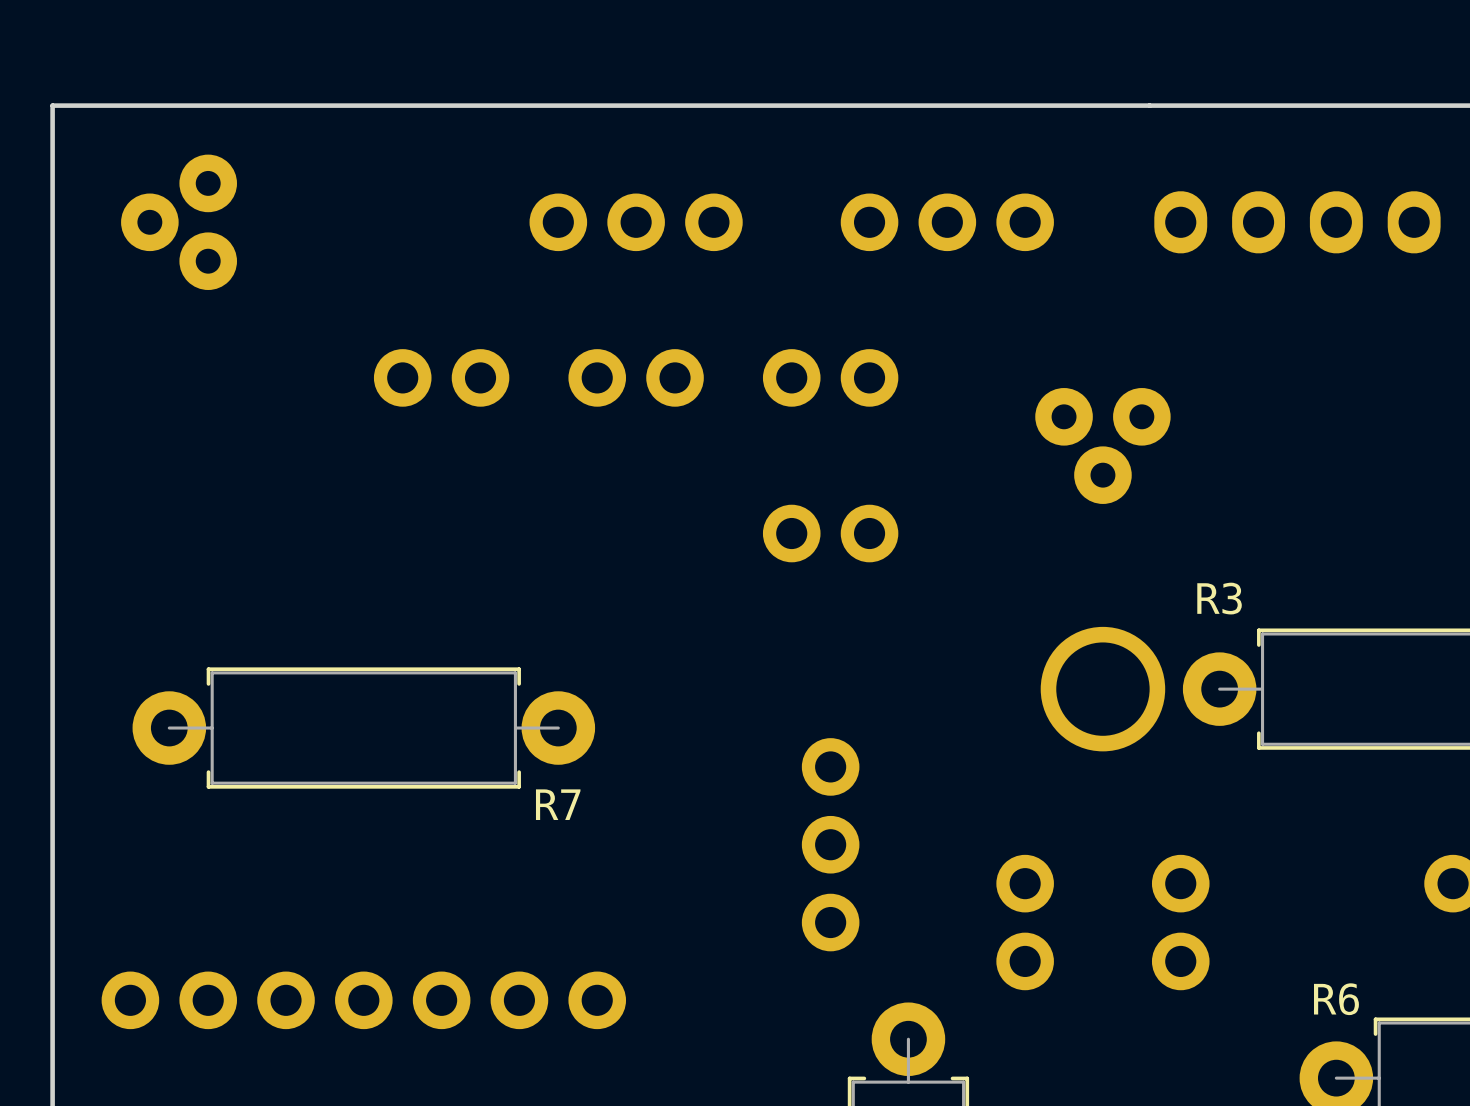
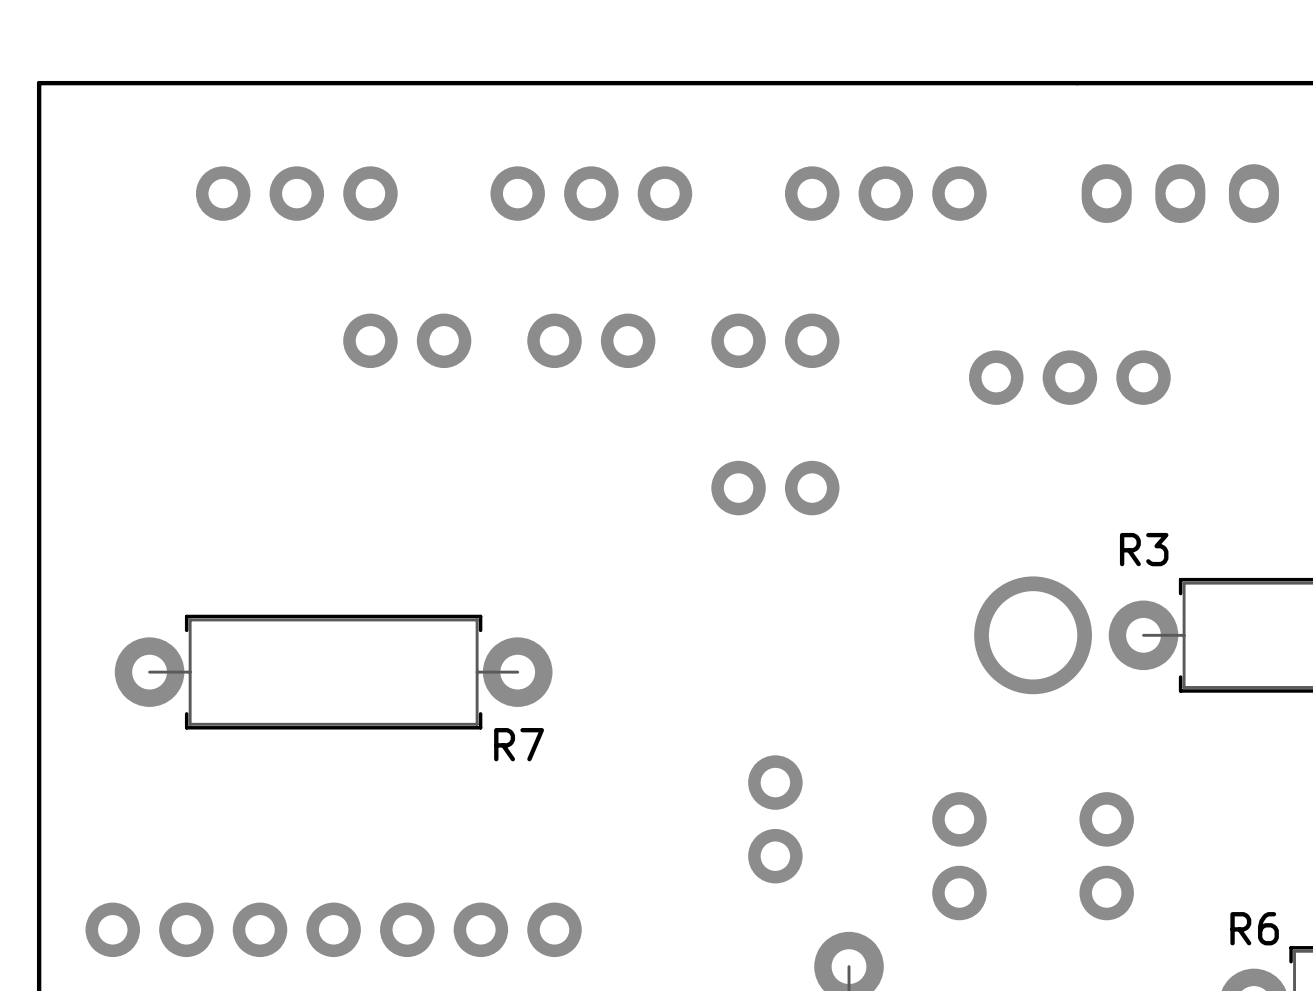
part: (179, 222) -> none
part: none -> (296, 193)
part: none -> (1069, 377)
part: (1102, 445) -> none
part: (830, 844) -> none

